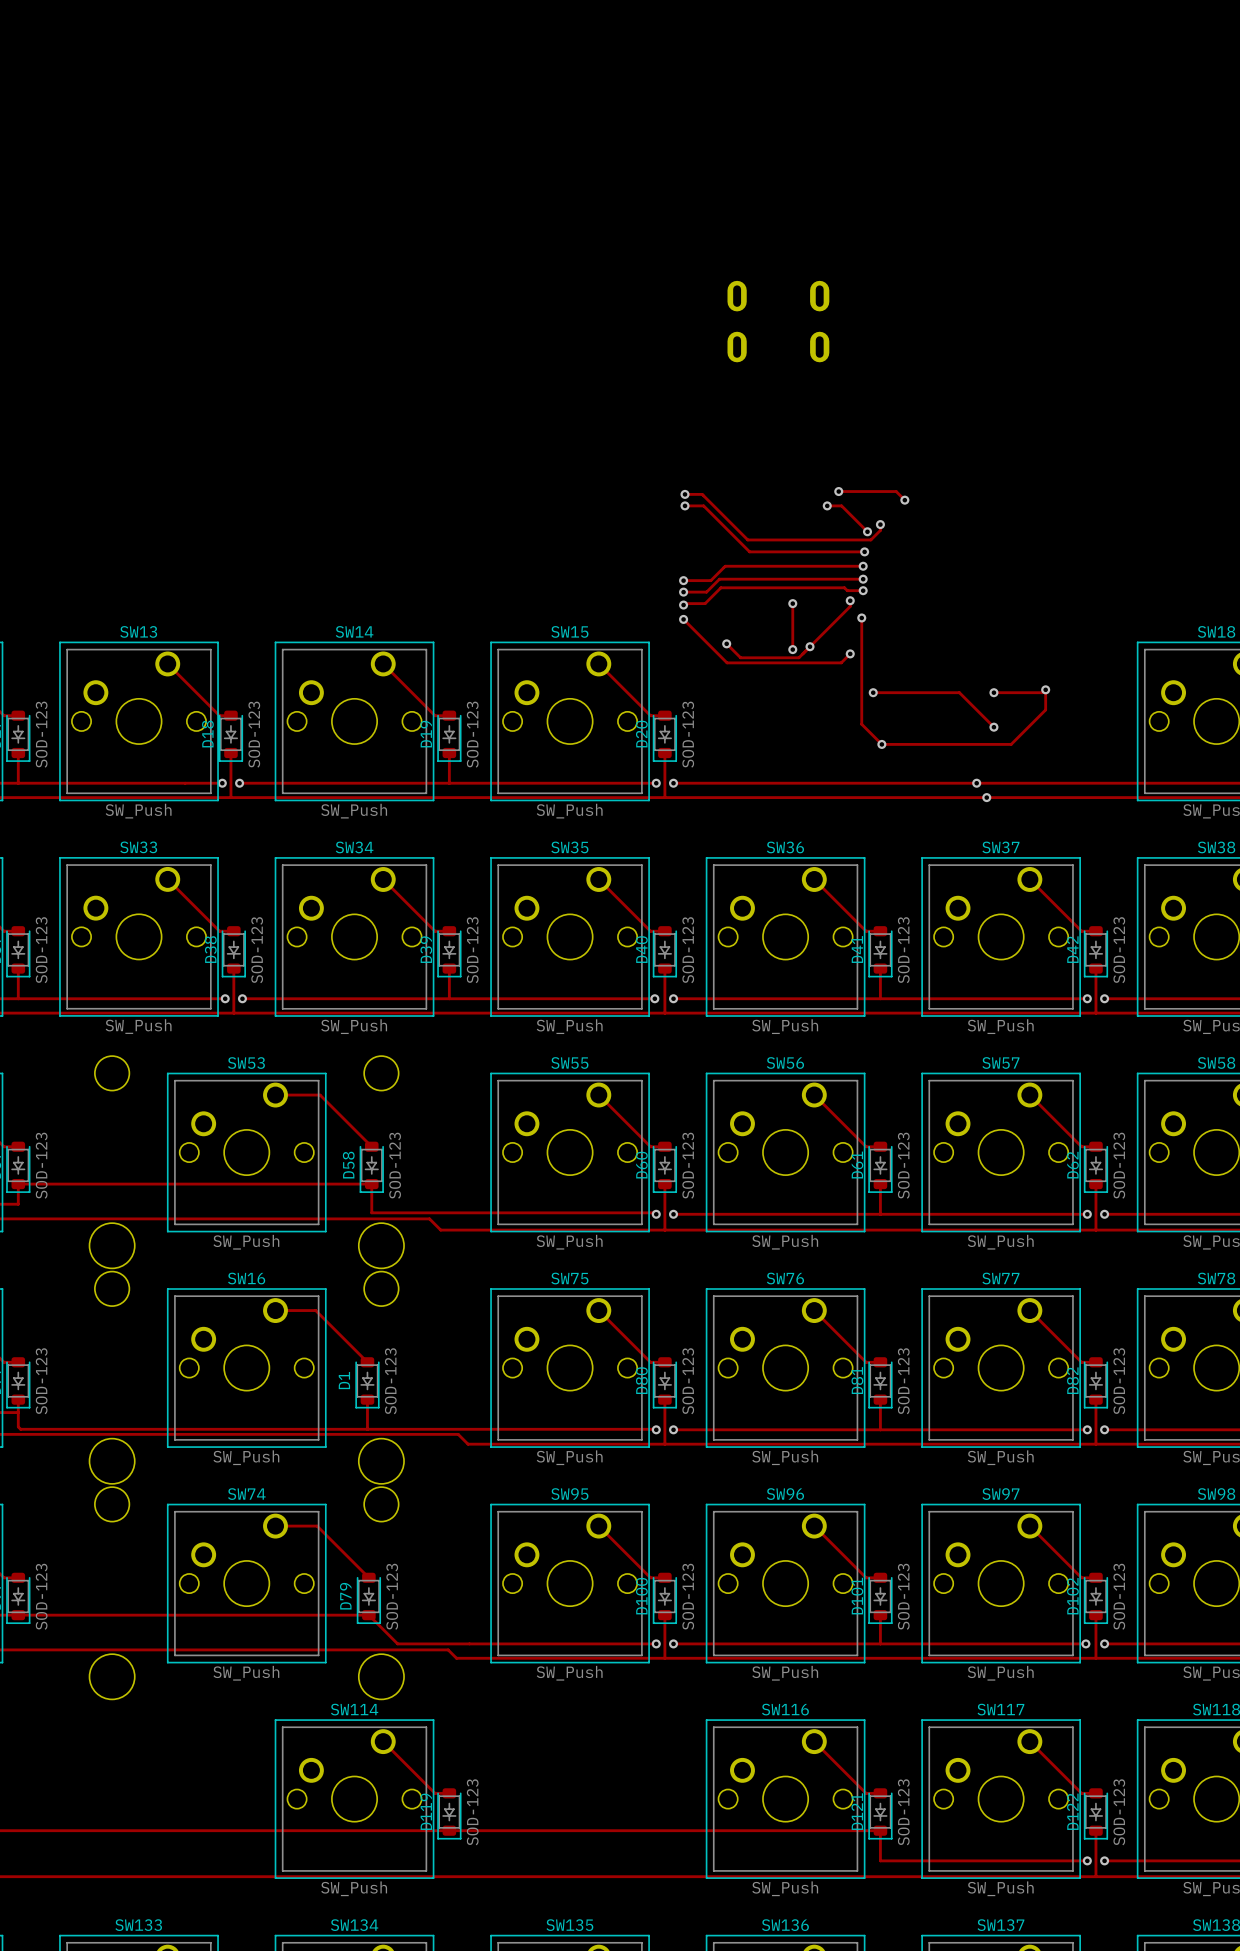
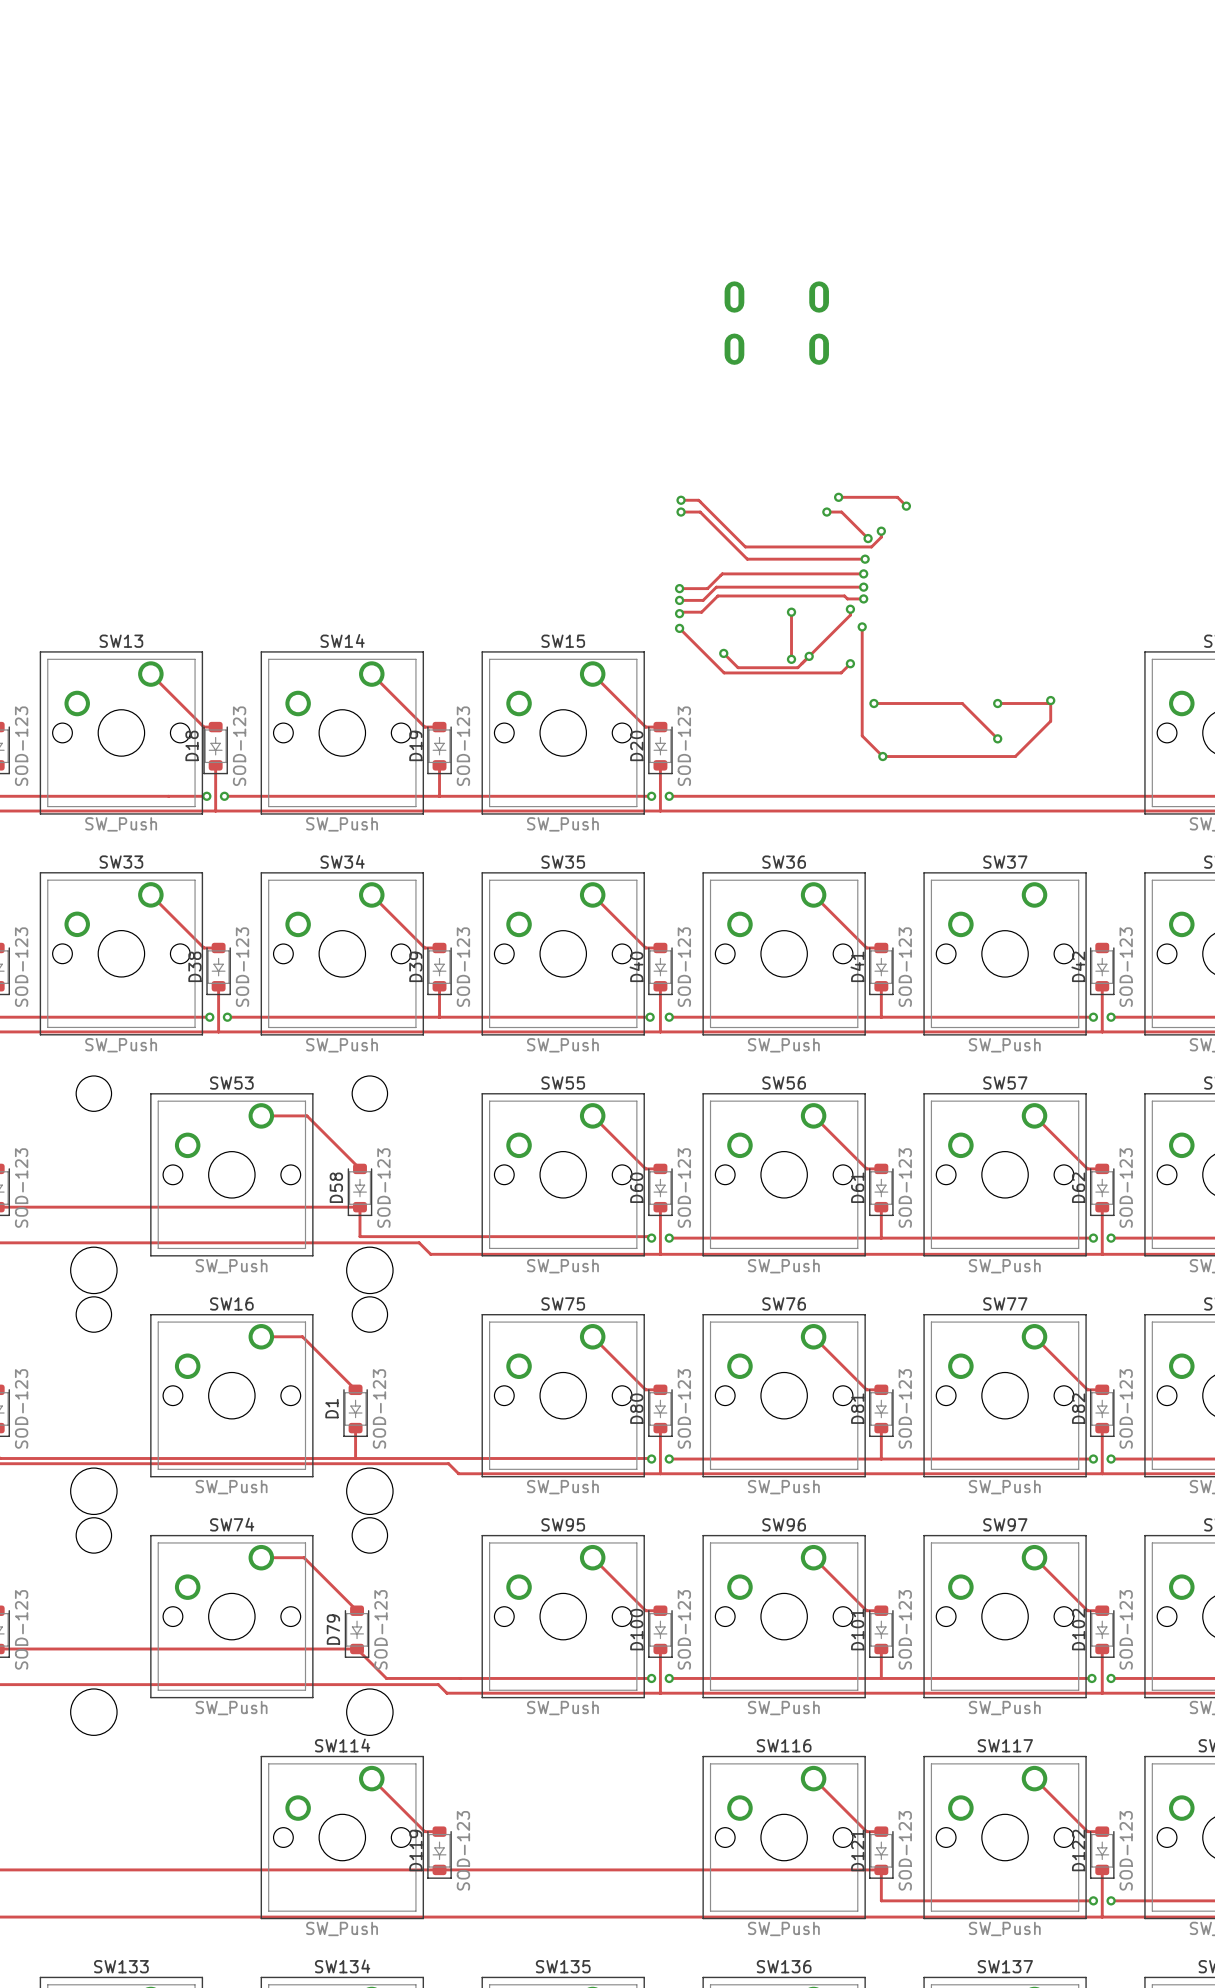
via: (976, 783) -> none
via: (986, 797) -> none
track: (1029, 879) (1081, 931) (1095, 931) -> none

